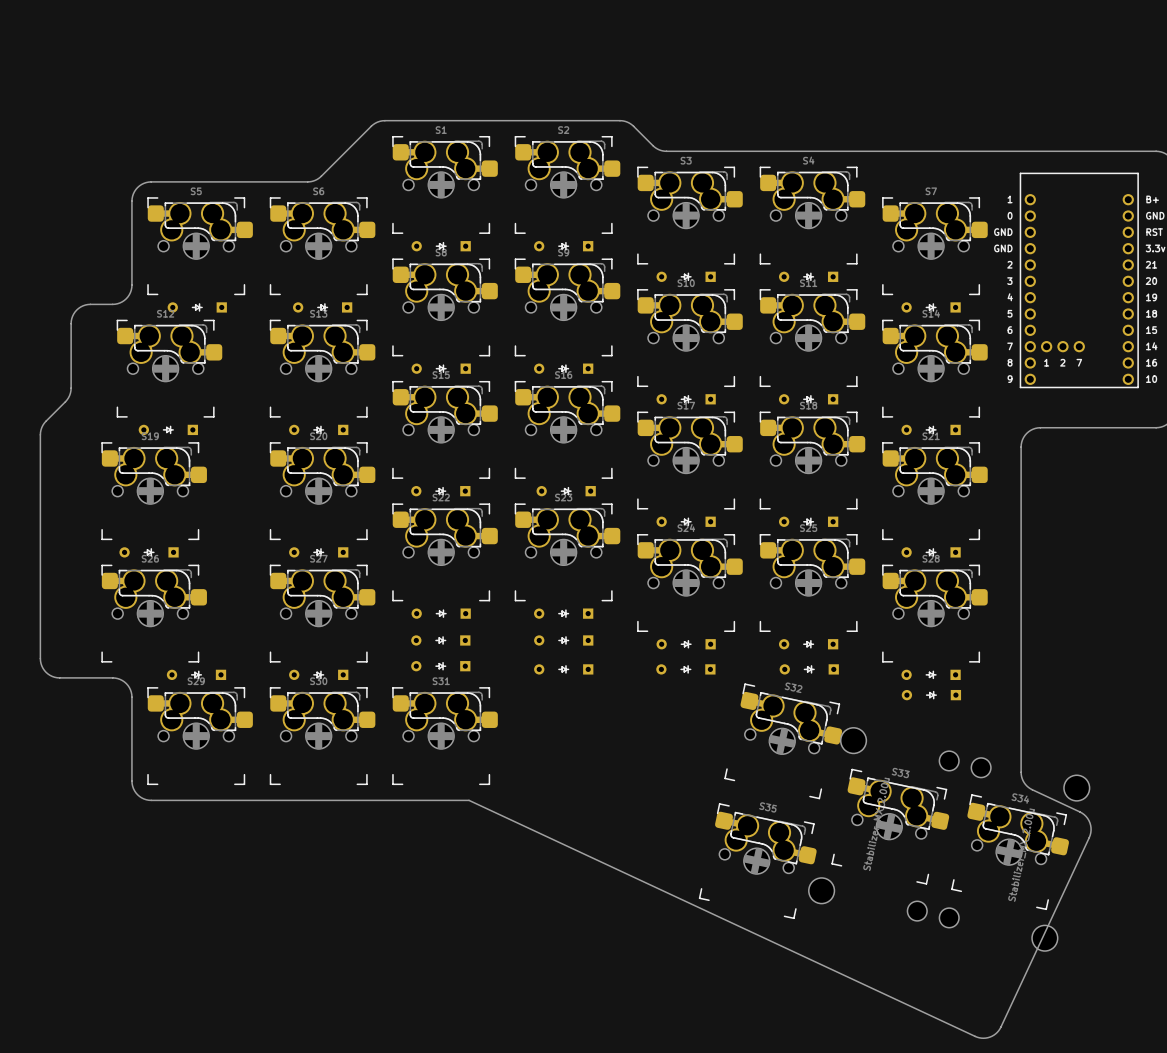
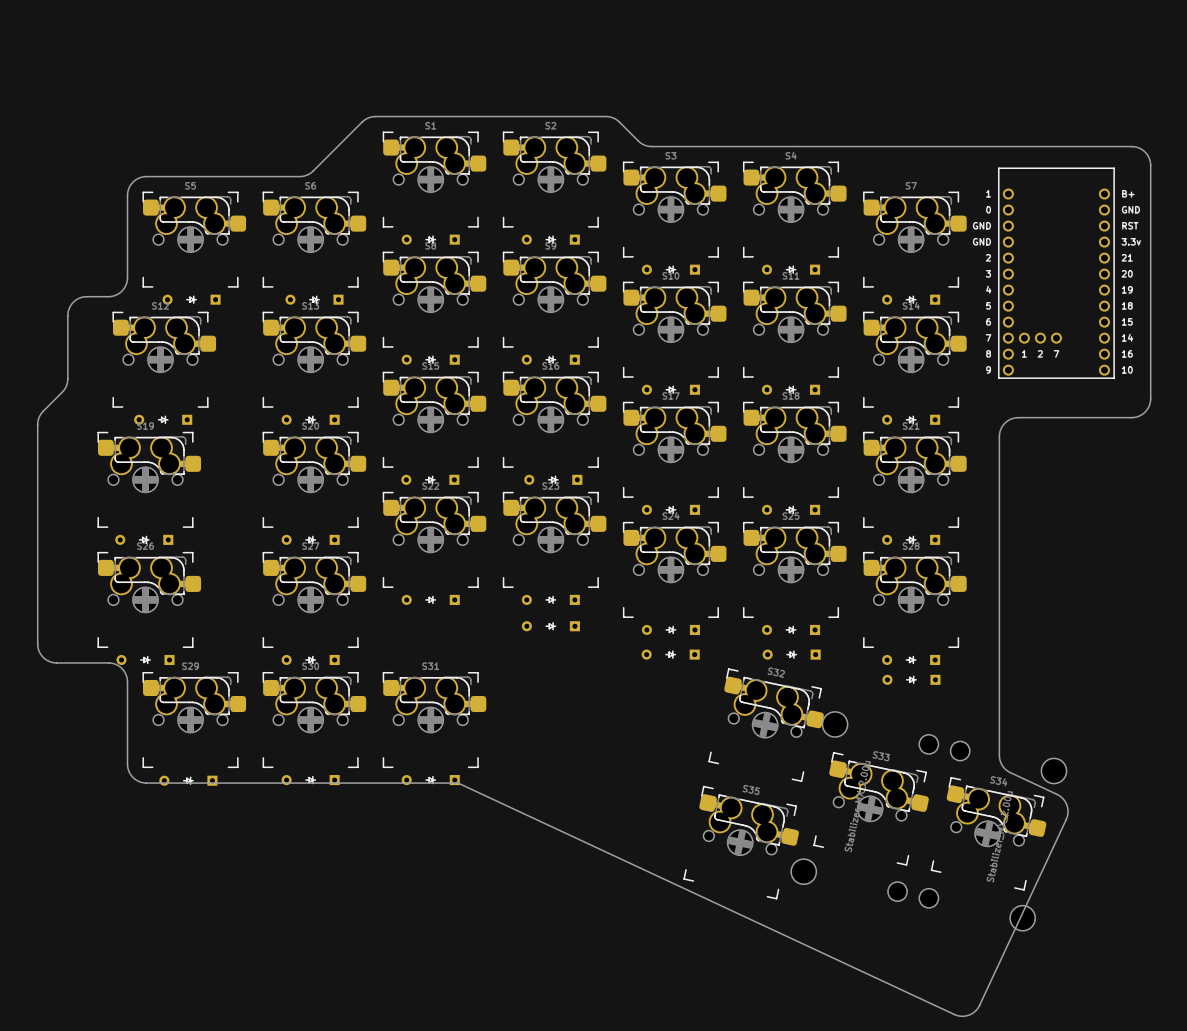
part: (440, 640) -> none
part: (440, 666) -> none
part: (563, 669) -> none
part position: (196, 674) -> (145, 659)
part: none -> (188, 780)
part: none -> (310, 780)
part: none -> (430, 780)

